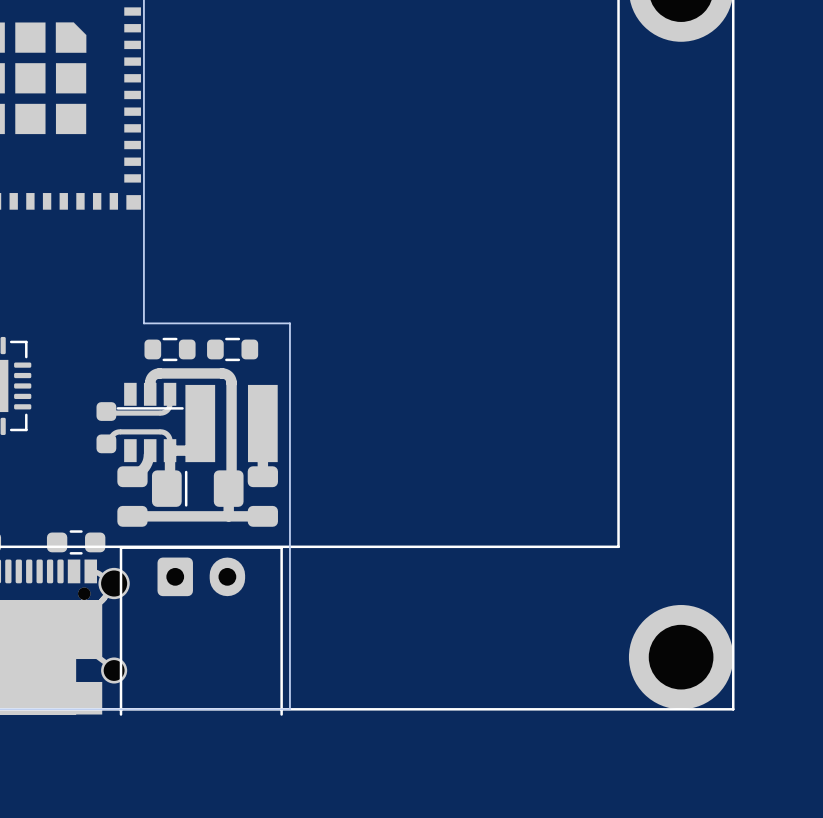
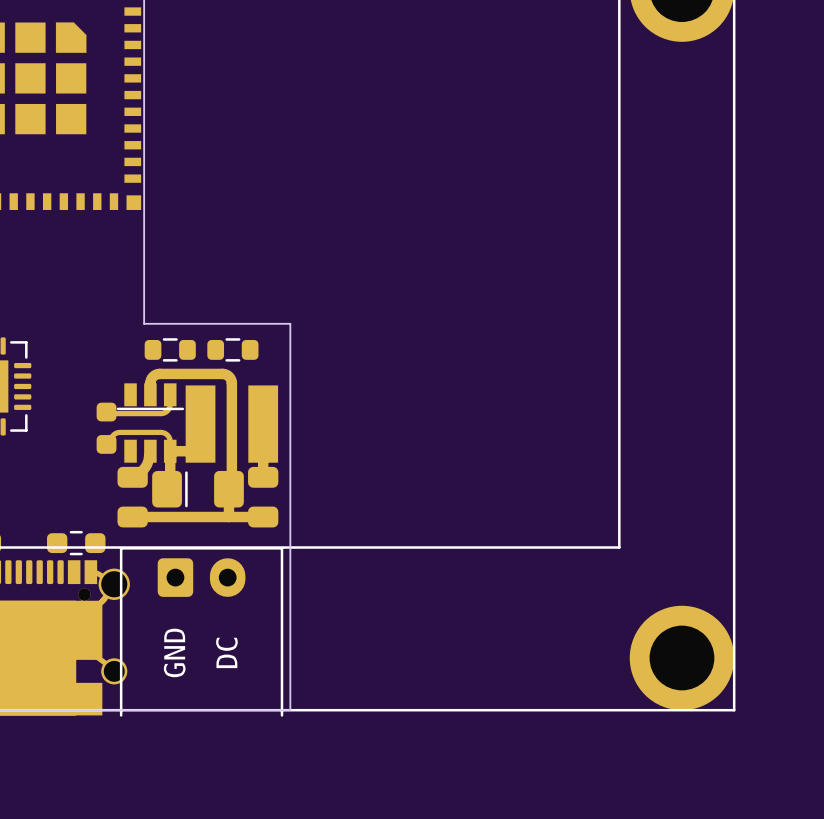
text: none -> GND (174, 652)
text: none -> DC (226, 652)

